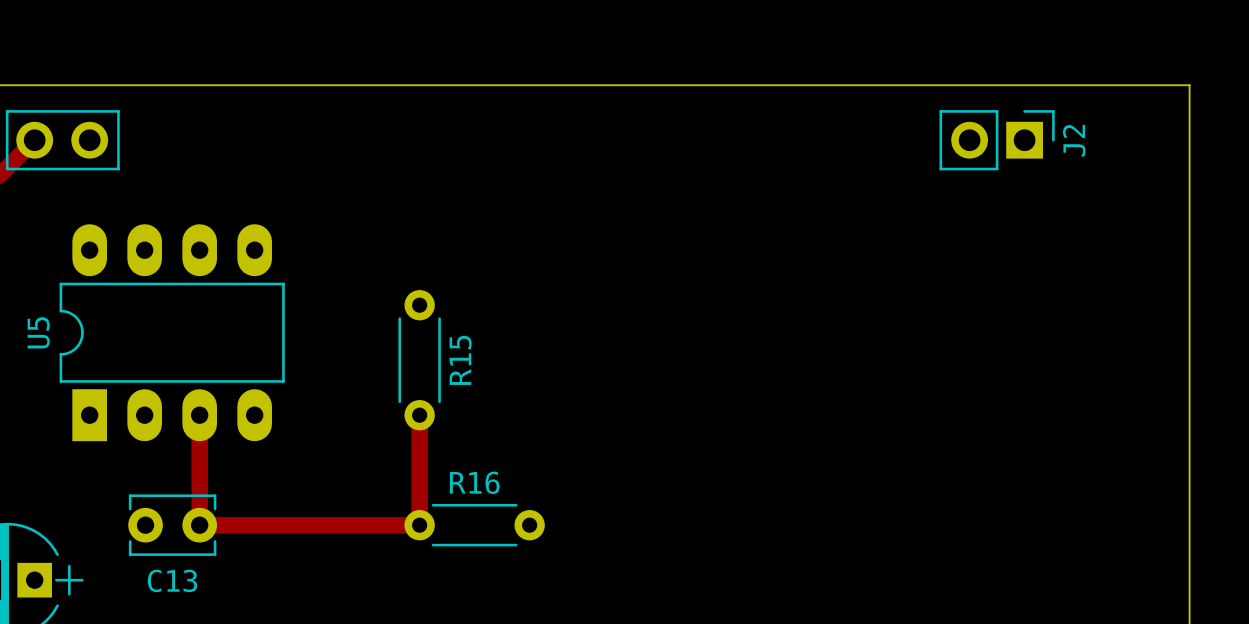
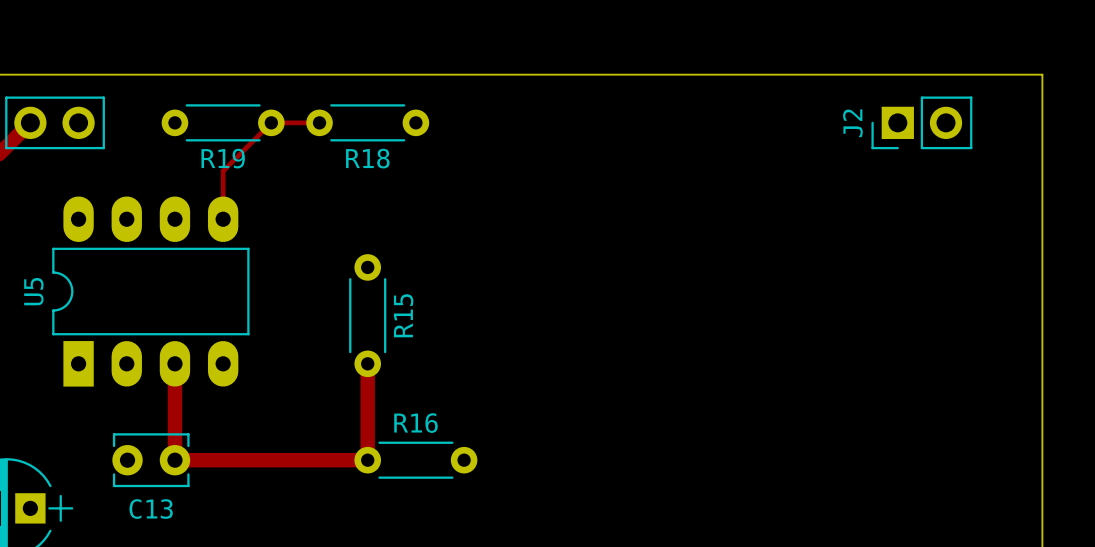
R19: none -> (223, 122)
track: none -> (319, 122) (271, 122) (223, 171) (223, 219)
R18: none -> (367, 122)
J2 rotation: 0° (997, 140) -> 180° (921, 122)

